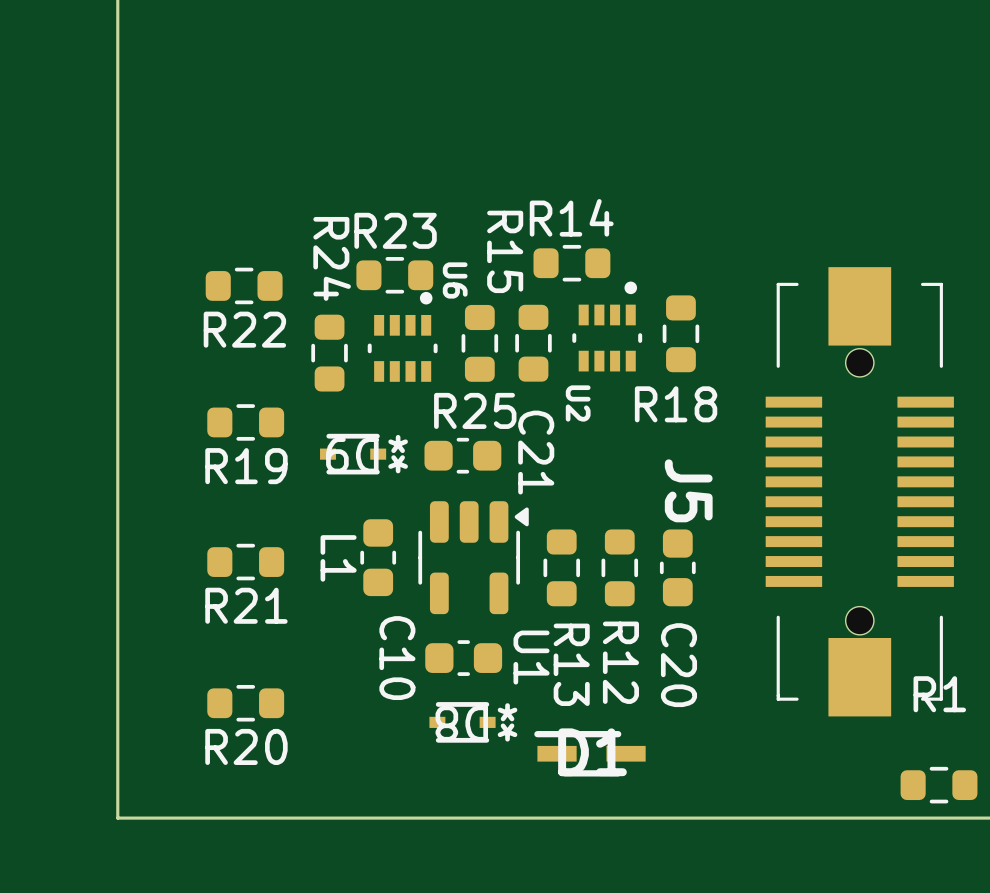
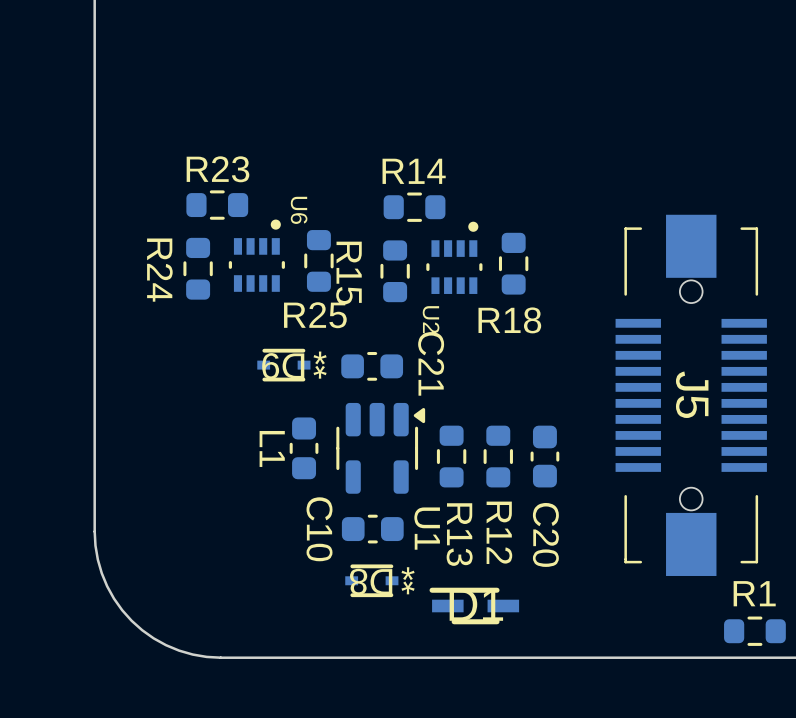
R15 name position: R15 (505, 251) -> R15 (348, 273)
R24 name position: R24 (332, 258) -> R24 (159, 270)
R14 position: (571, 263) -> (414, 207)
R23 position: (394, 275) -> (217, 205)
R22: (244, 285) -> none
U2 position: (607, 326) -> (454, 257)
R18 position: (680, 333) -> (513, 263)
U6 position: (402, 336) -> (256, 255)
R25 position: (479, 343) -> (318, 260)
R15 position: (533, 343) -> (395, 271)
R24 position: (329, 353) -> (198, 268)
R19: (245, 422) -> none
J5 name position: J5 (688, 490) -> J5 (692, 394)
R21: (245, 562) -> none
board edge: (117, 661) (117, 818) (274, 818) -> (94, 531) (97, 559) (107, 586) (122, 610) (131, 620) (153, 638) (179, 650) (206, 656) (220, 657)
R1 name position: R1 (939, 694) -> R1 (754, 593)
R20: (245, 703) -> none

